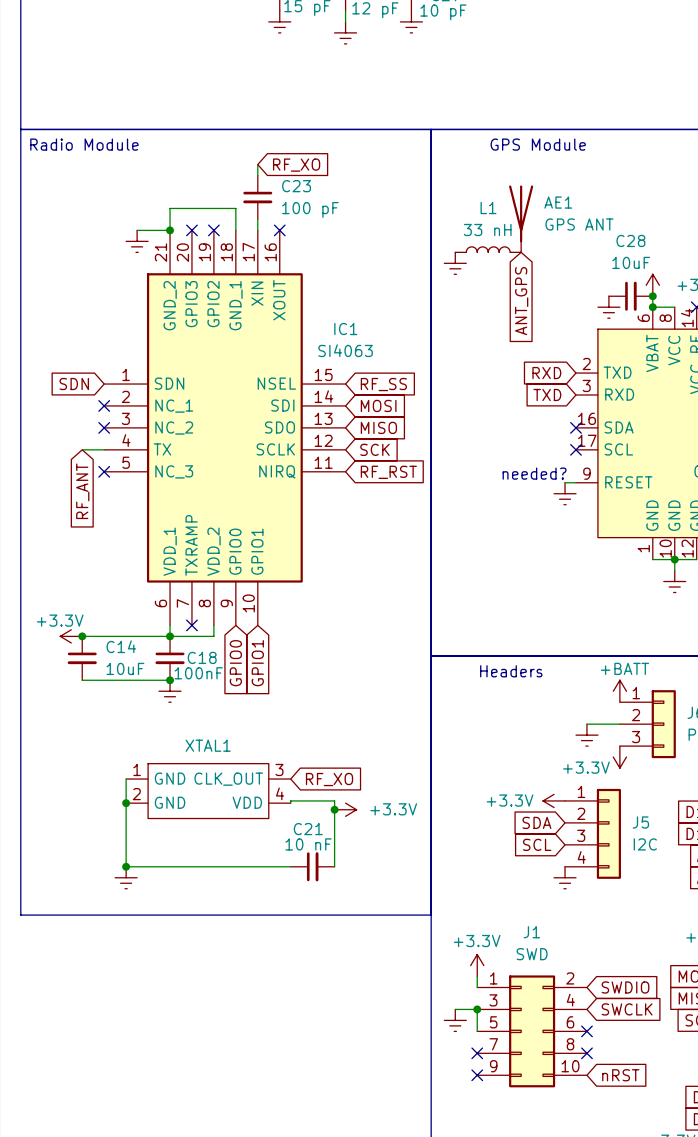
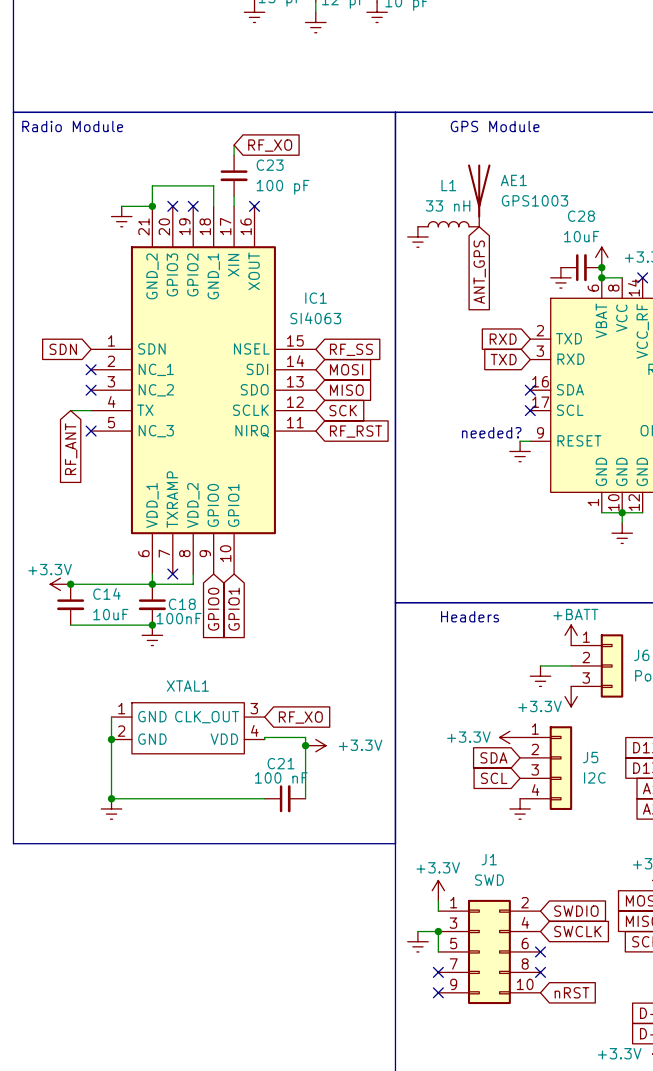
AE1 value: GPS ANT (579, 224) -> GPS1003 (534, 200)
C21 value: 10 nF (308, 844) -> 100 nF (281, 777)

